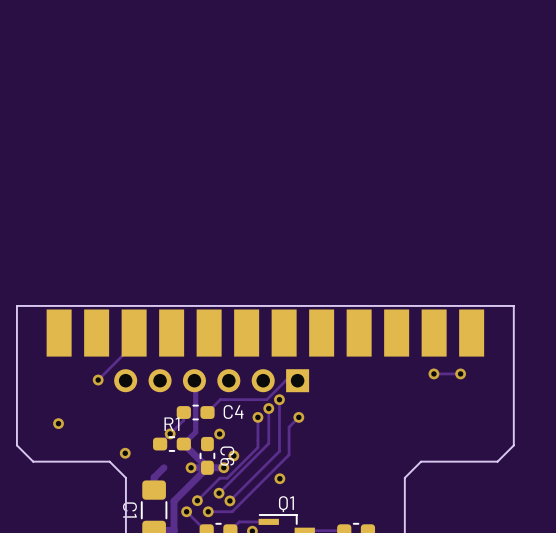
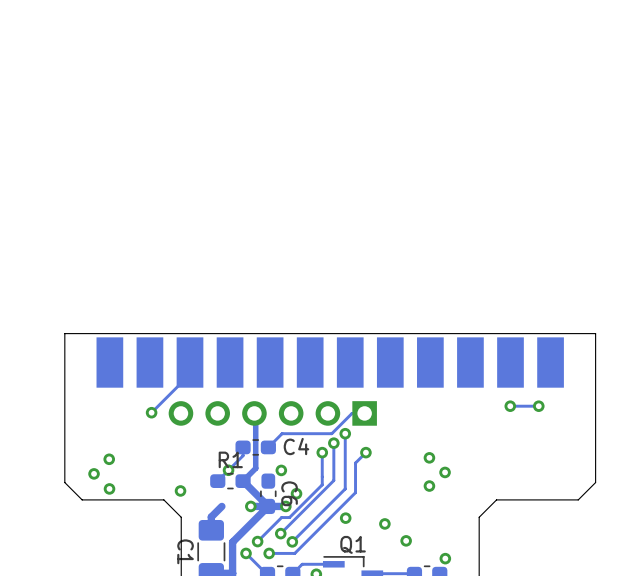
via: none -> (429, 457)
via: none -> (445, 472)
via: none -> (94, 473)
via: none -> (429, 486)
via: none -> (109, 488)
via: none -> (384, 523)
via: none -> (406, 540)
via: none -> (445, 558)

